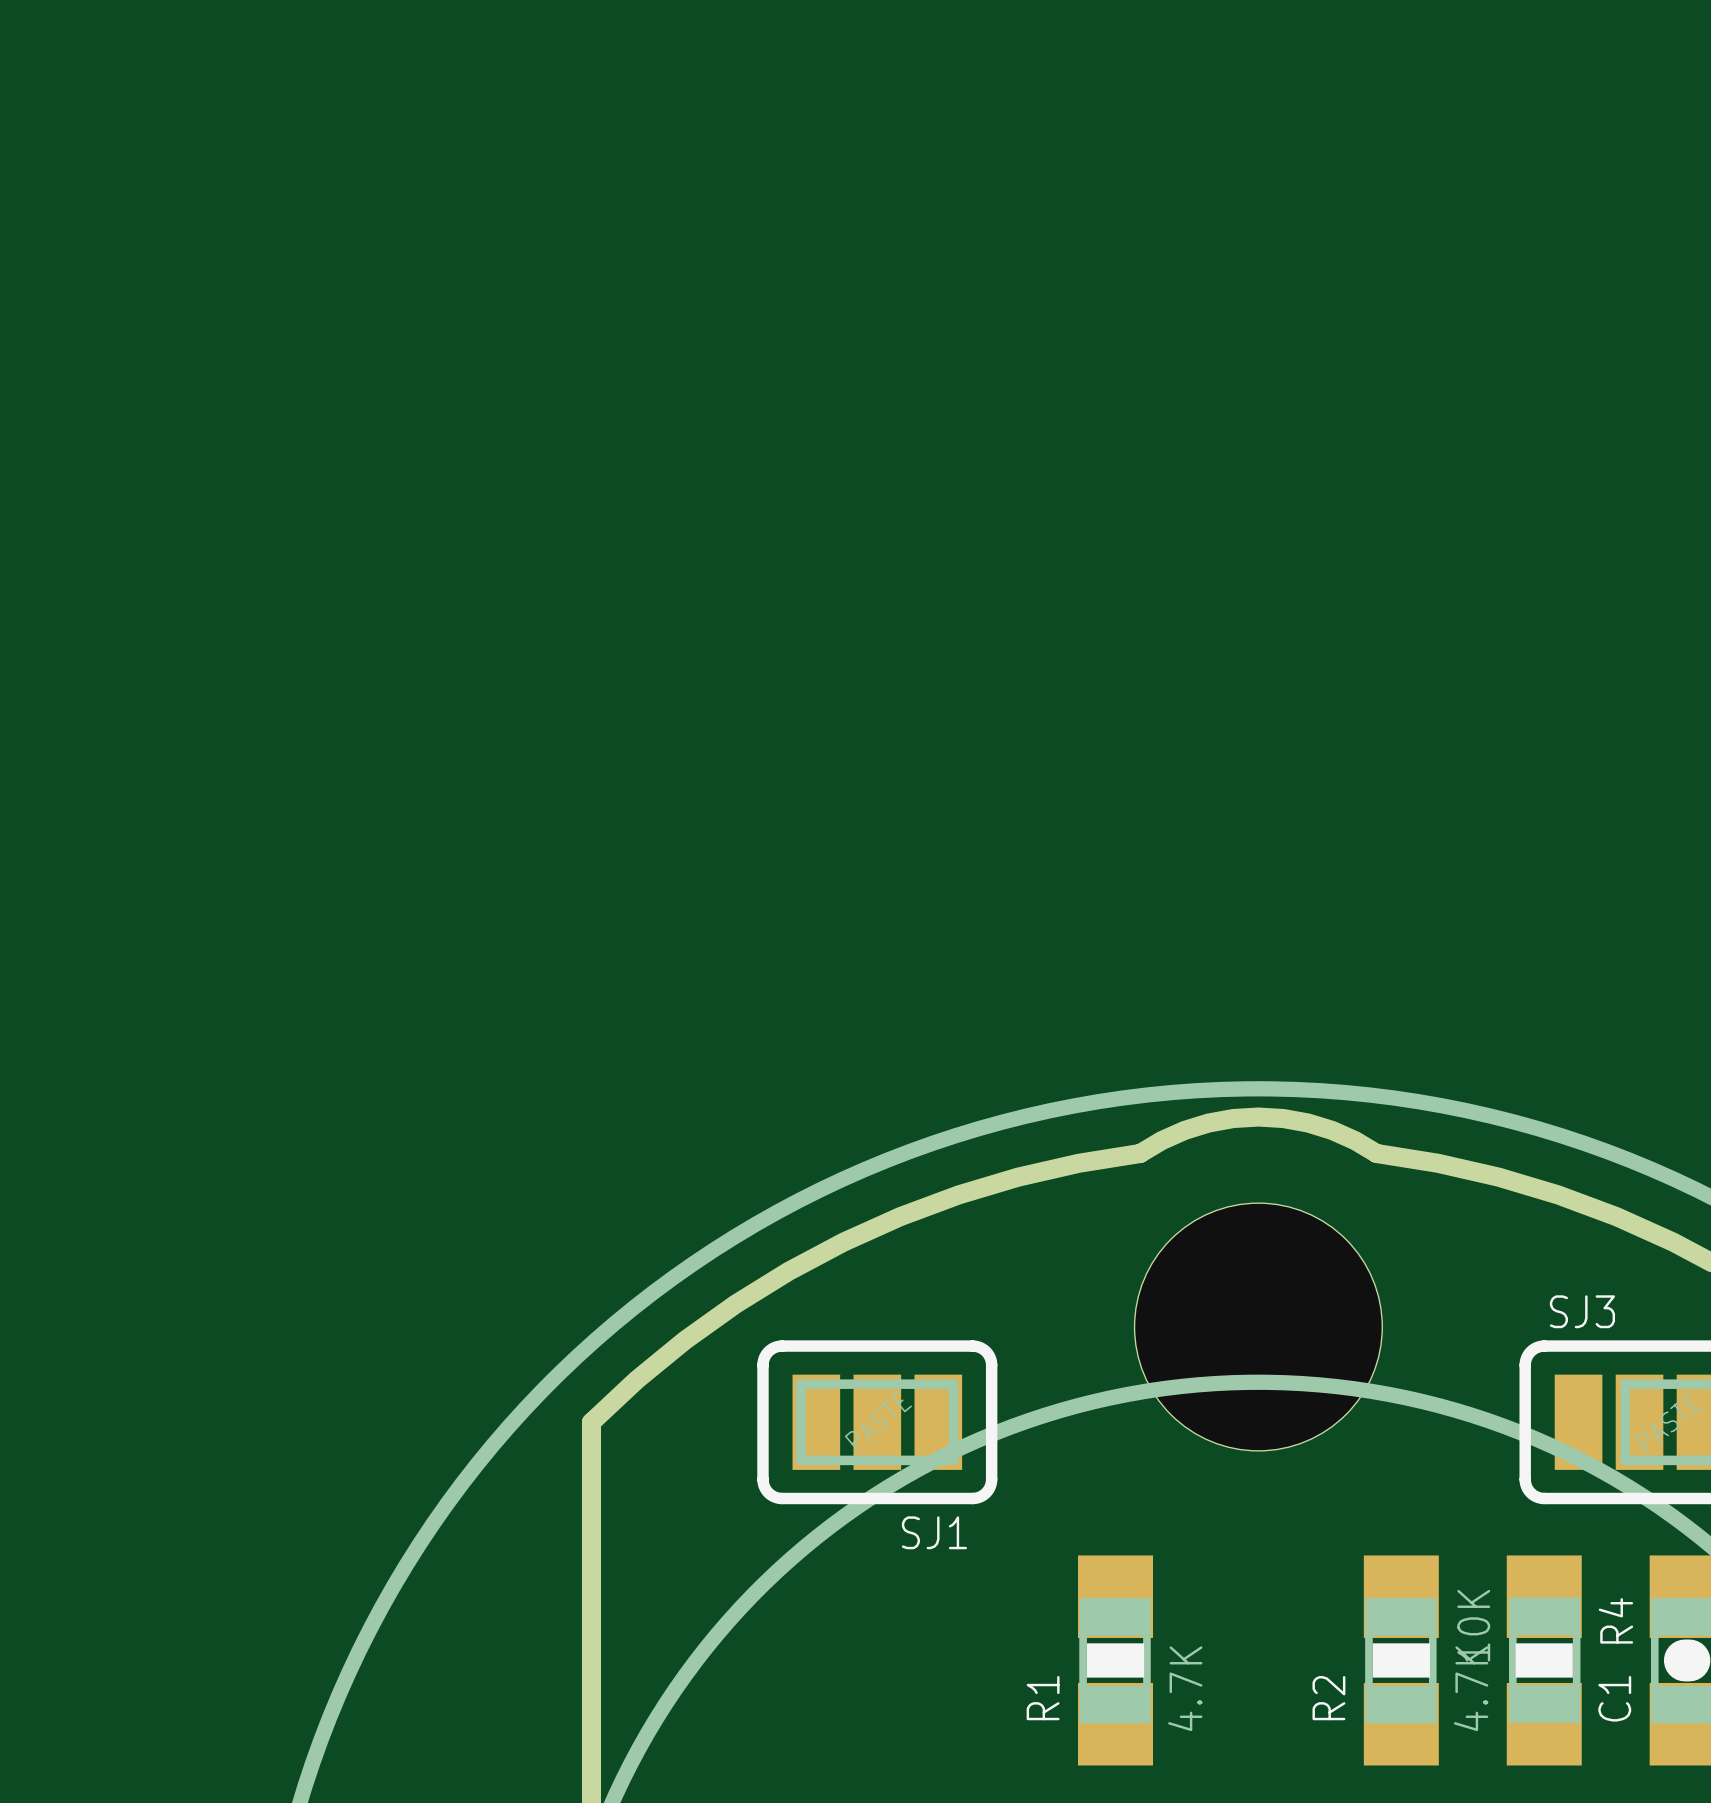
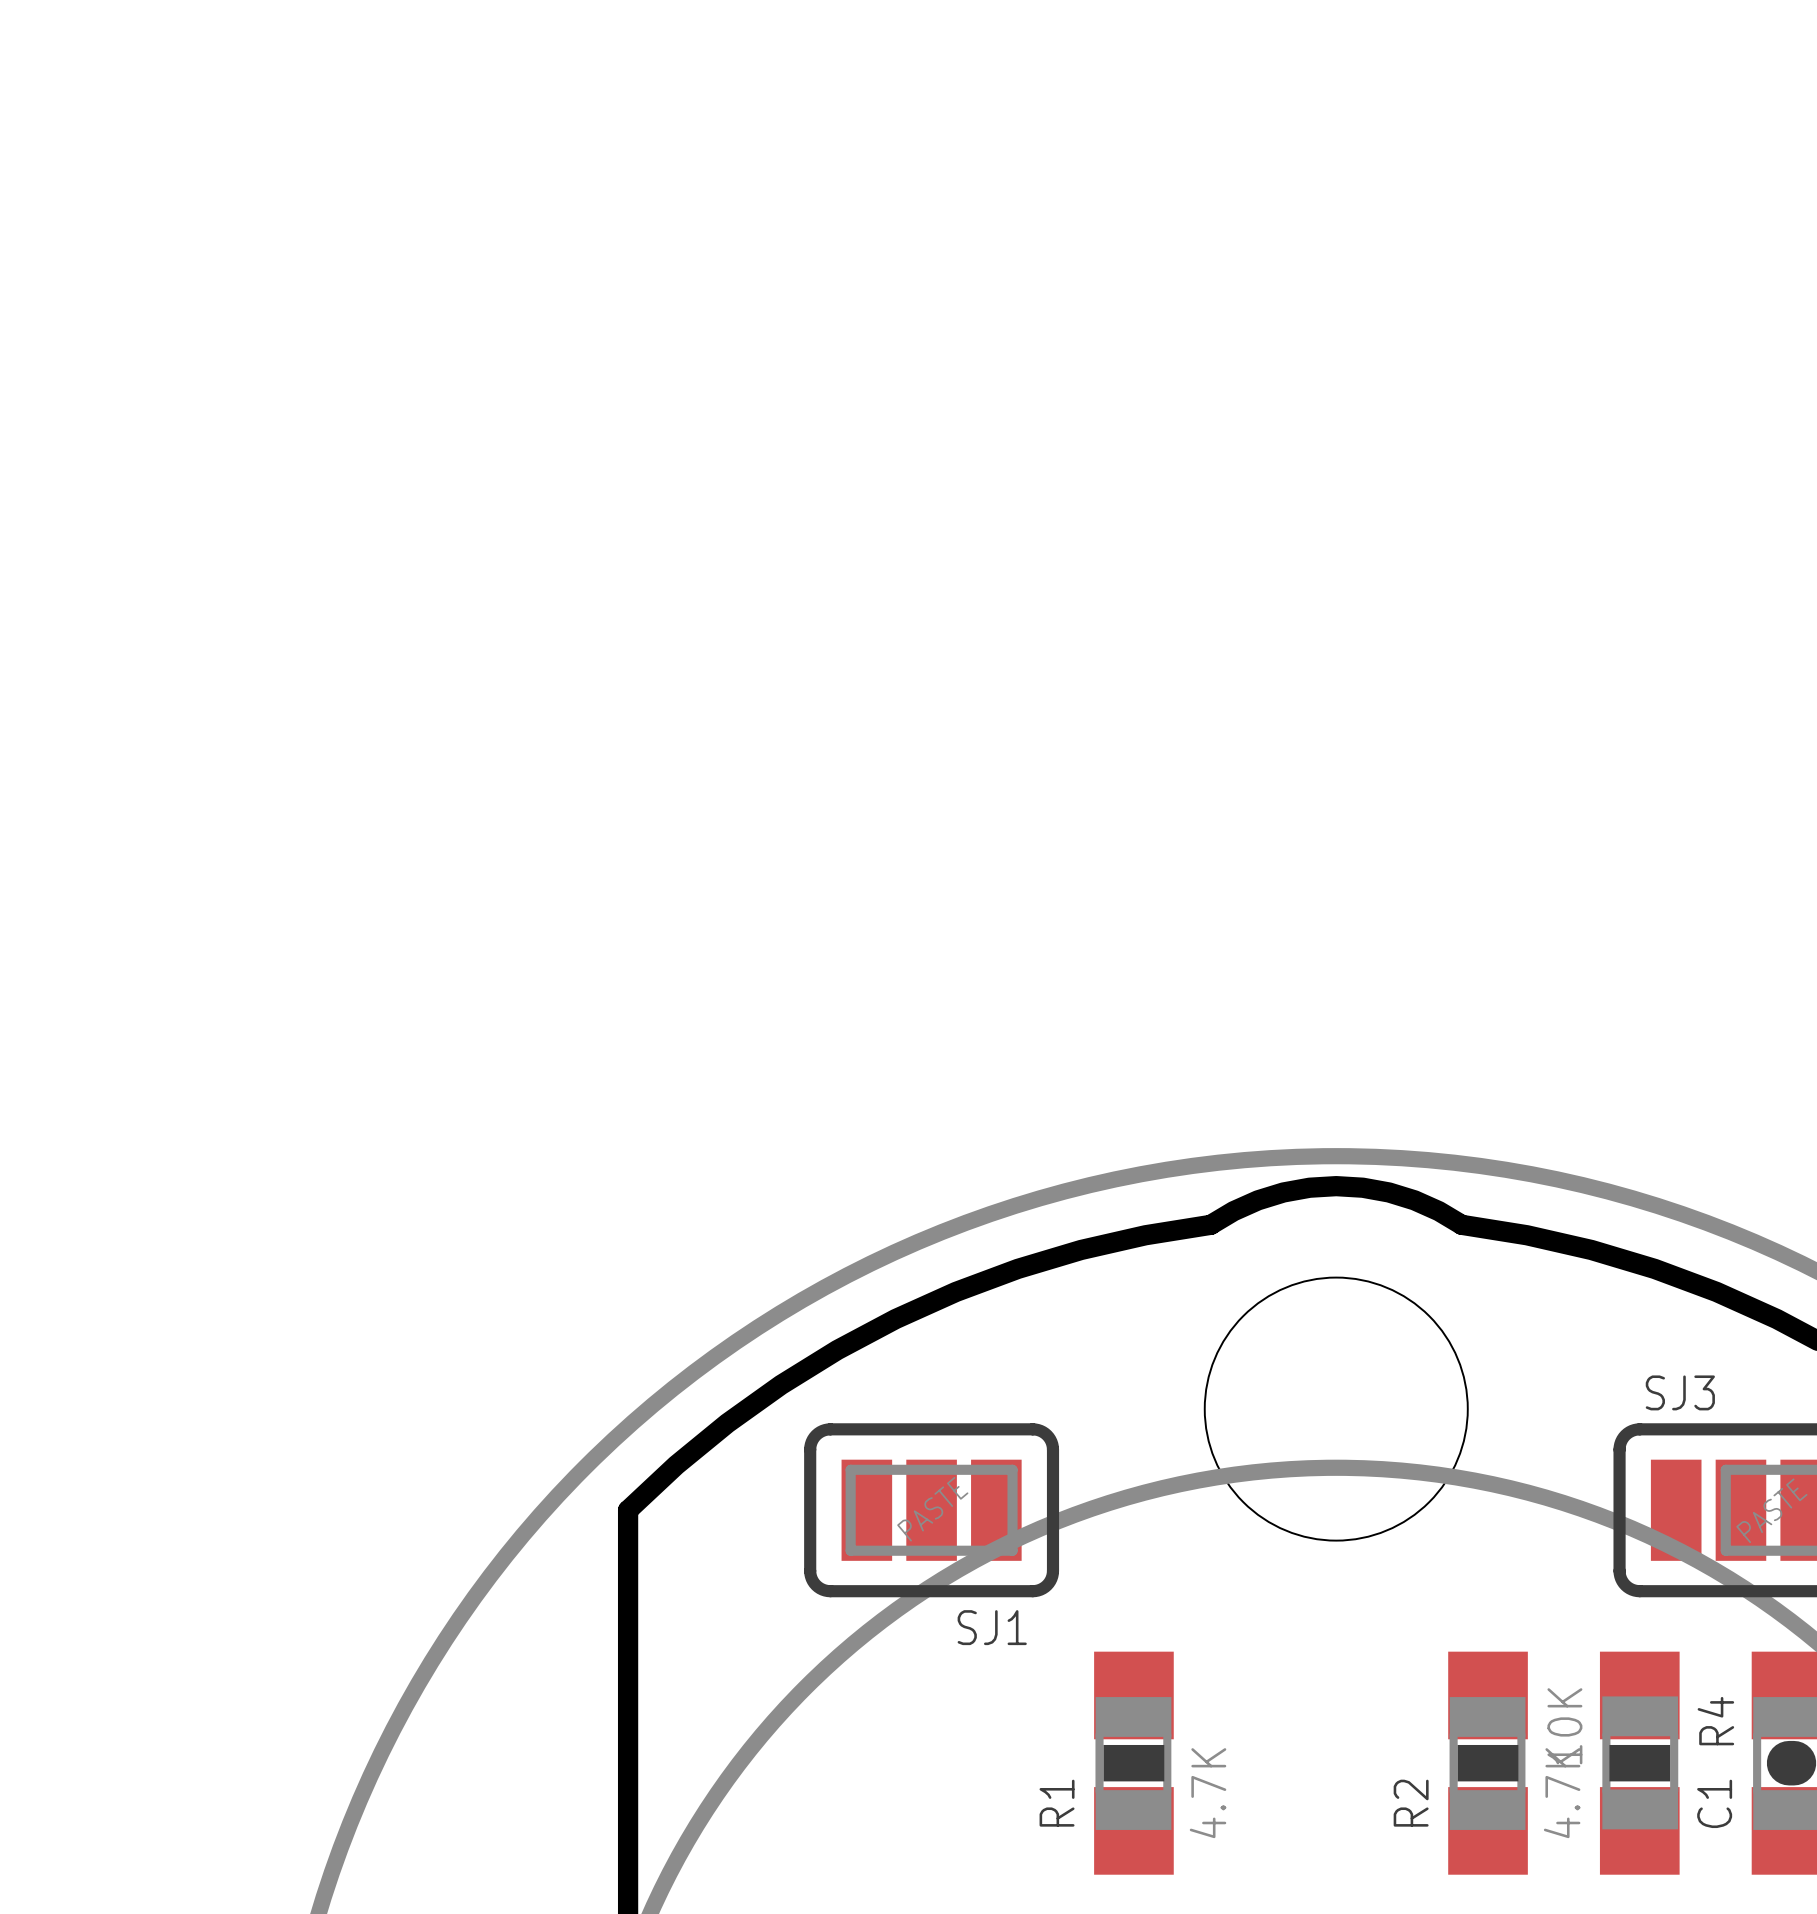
R1 position: (1115, 1660) -> (1133, 1763)

